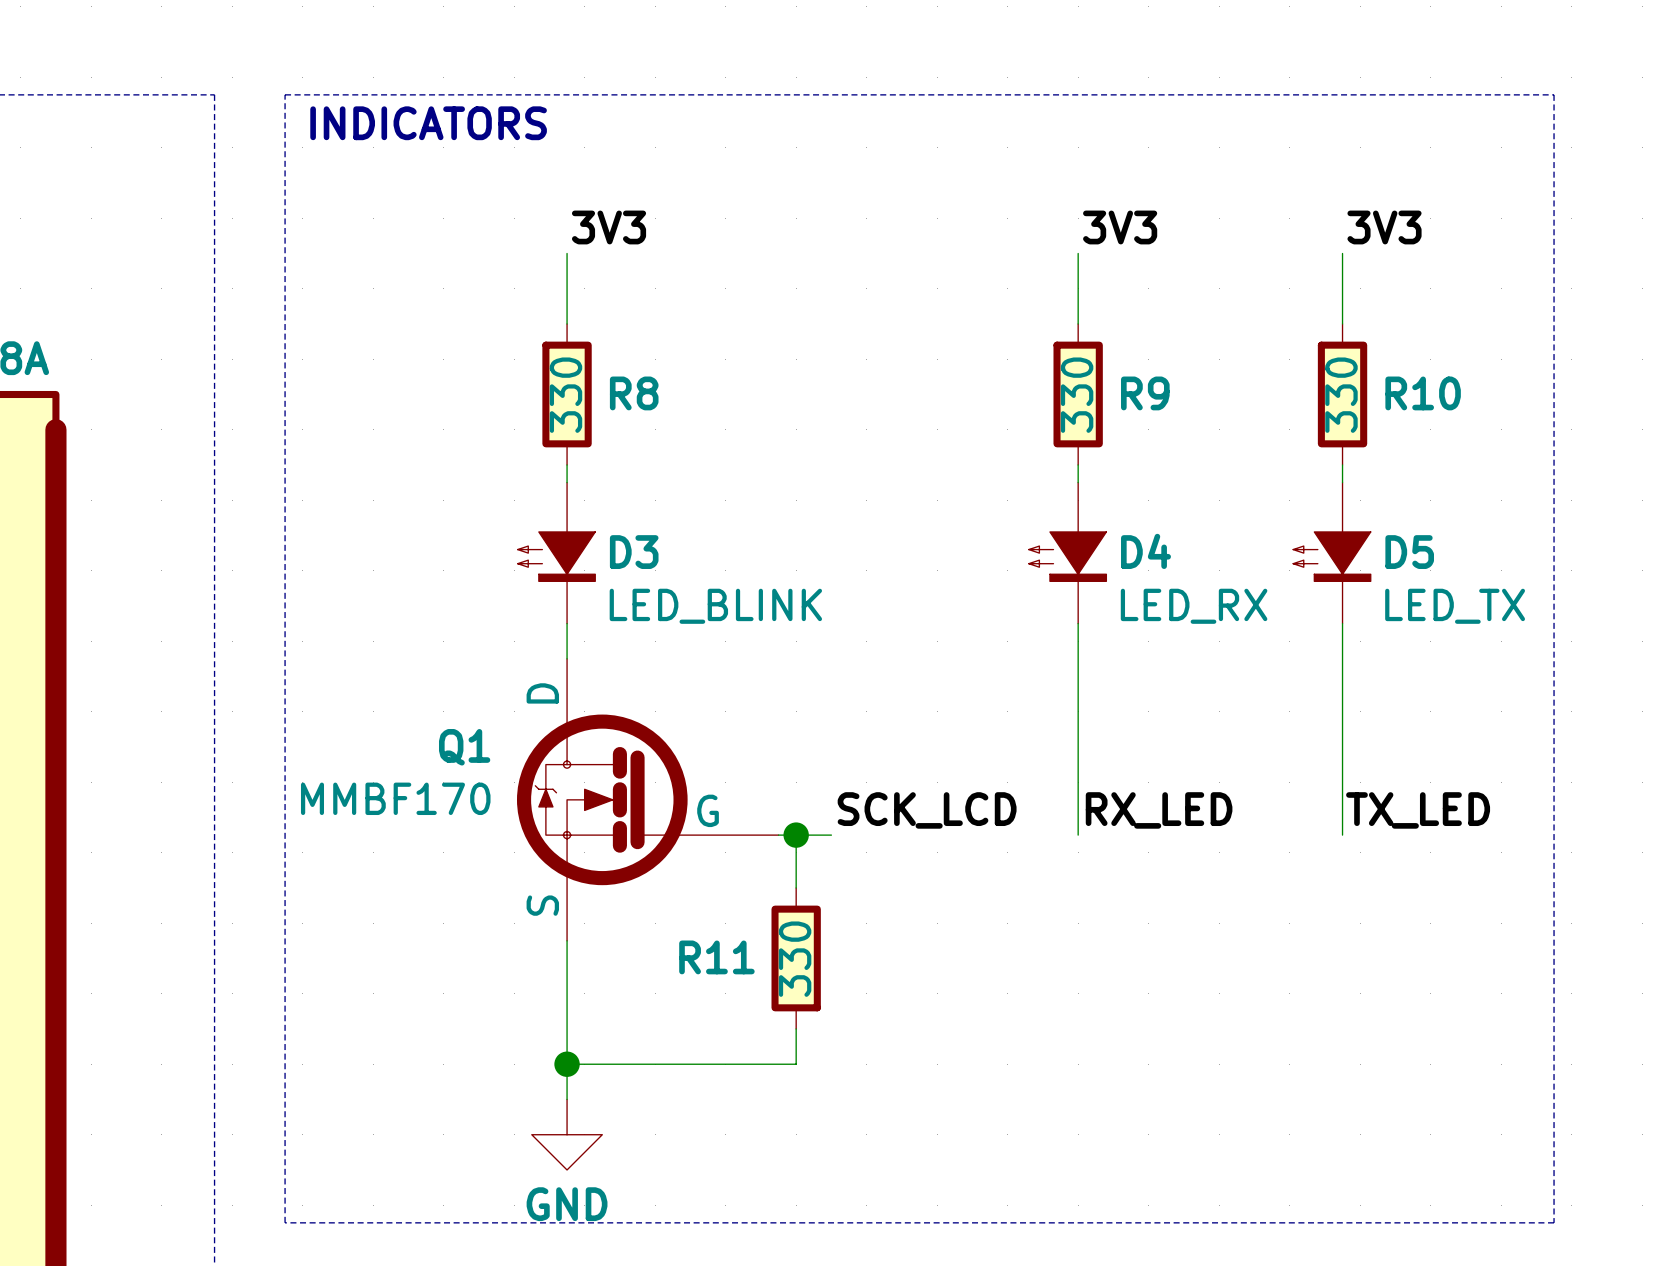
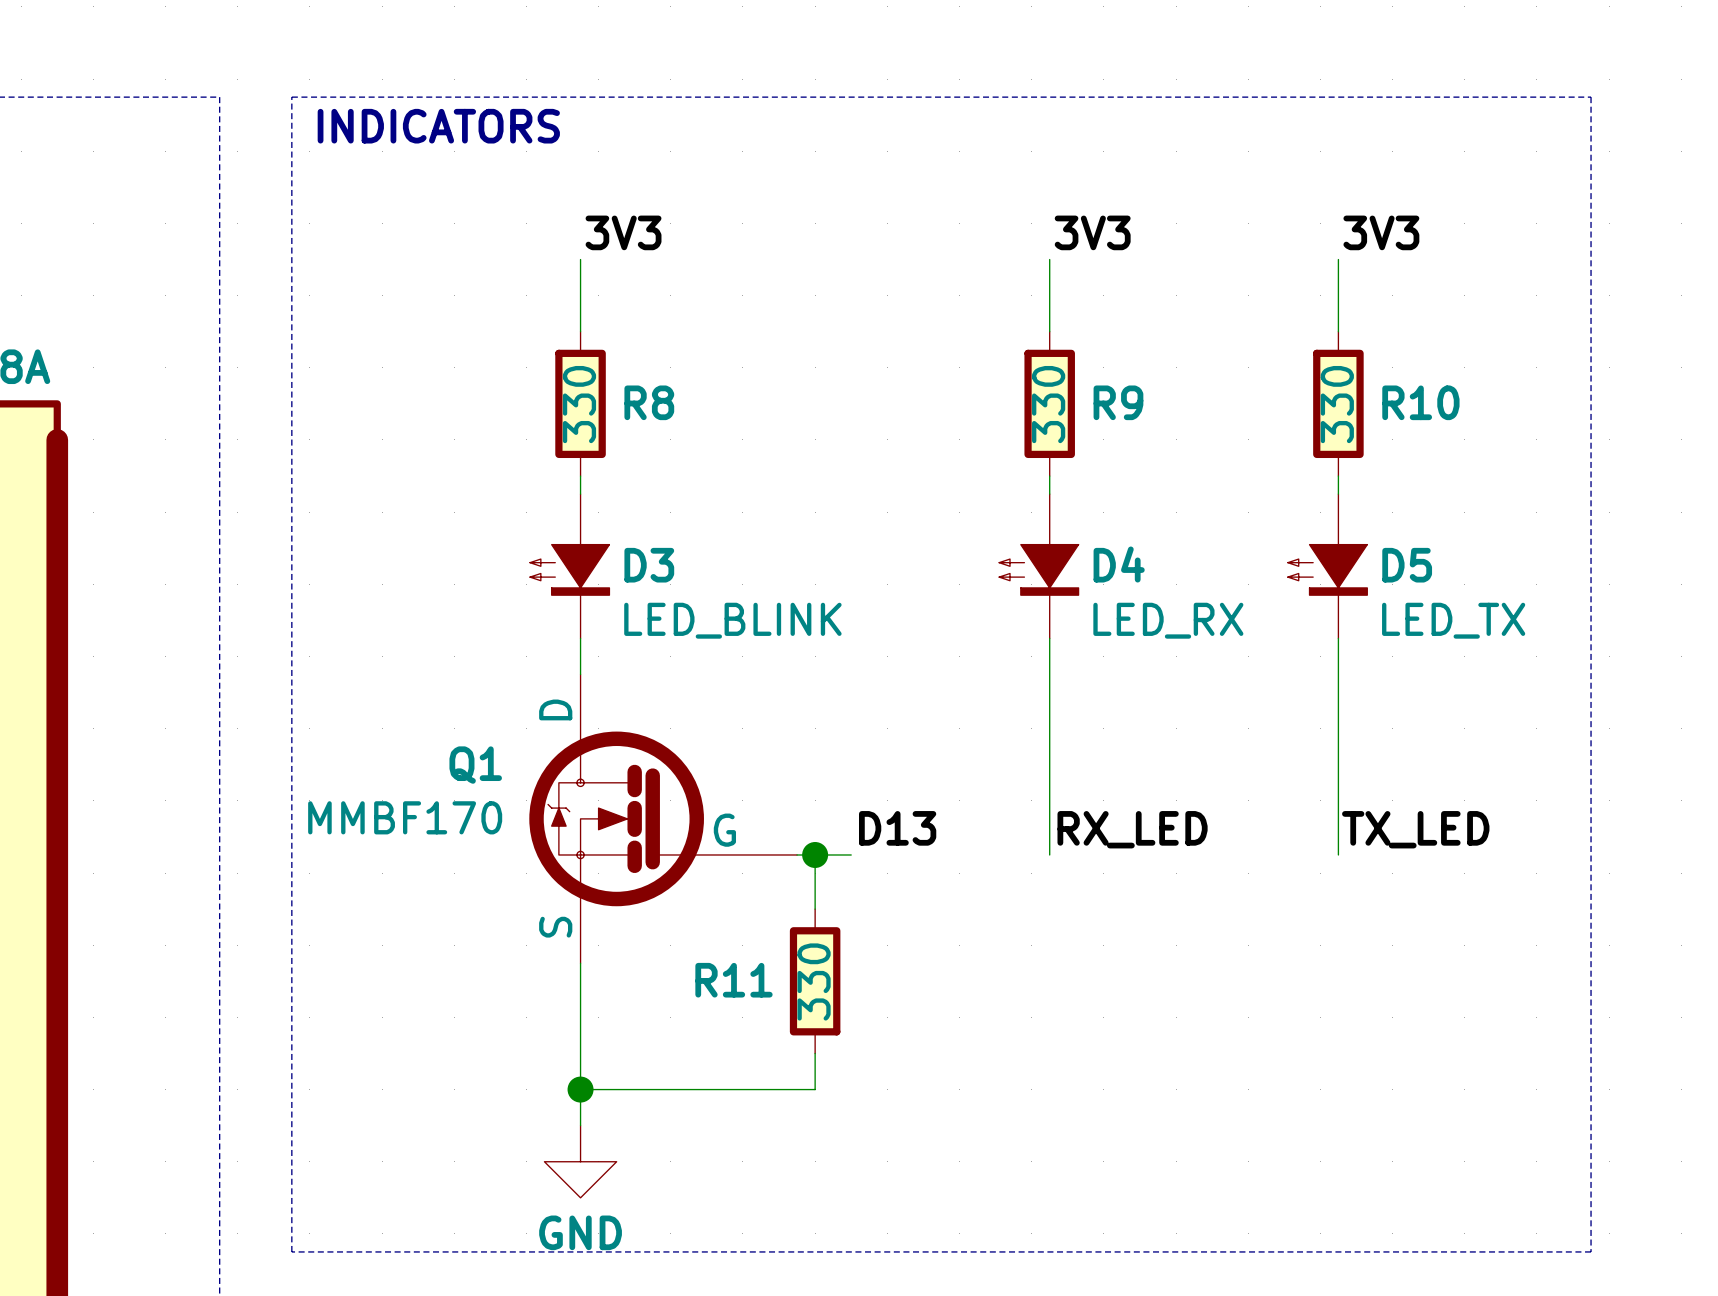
label position: 3V3 (1120, 227) -> 3V3 (1092, 232)
label position: 3V3 (1384, 227) -> 3V3 (1381, 232)
wire: (1078, 253) (1078, 323) -> (1049, 259) (1049, 331)
wire: (1342, 253) (1342, 323) -> (1338, 259) (1338, 331)
R9 position: (1078, 394) -> (1049, 403)
R10 position: (1342, 394) -> (1338, 403)
wire: (1078, 464) (1078, 482) -> (1049, 476) (1049, 494)
wire: (1342, 464) (1342, 482) -> (1338, 476) (1338, 494)
D4 position: (1067, 553) -> (1038, 566)
D5 position: (1331, 553) -> (1327, 566)
wire: (1078, 623) (1078, 835) -> (1049, 638) (1049, 854)
wire: (1342, 623) (1342, 835) -> (1338, 638) (1338, 854)
label: SCK_LCD (927, 810) -> D13 (897, 828)
label position: RX_LED (1159, 810) -> RX_LED (1132, 829)
label position: TX_LED (1418, 810) -> TX_LED (1415, 829)

